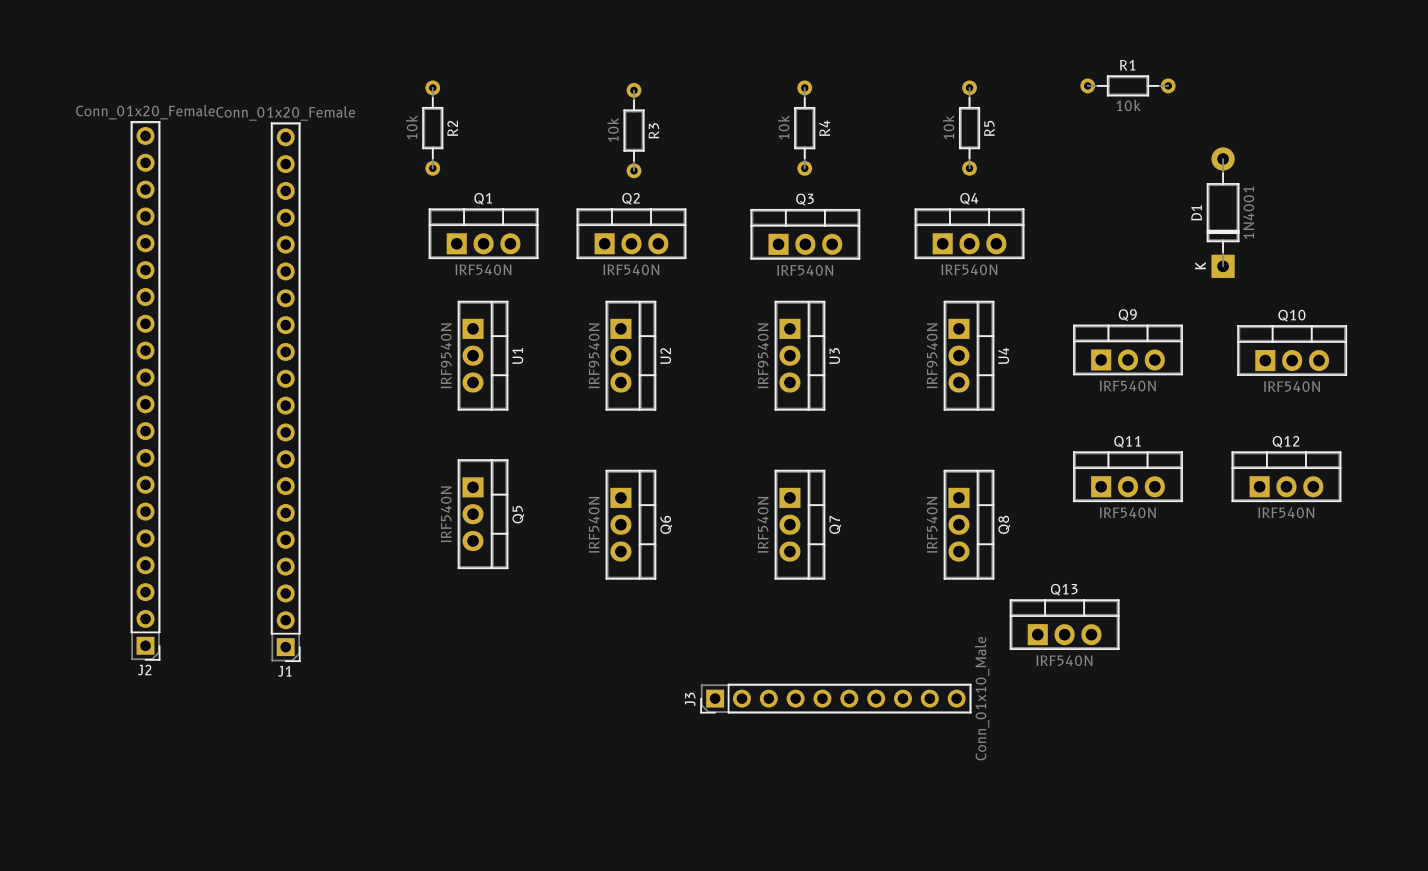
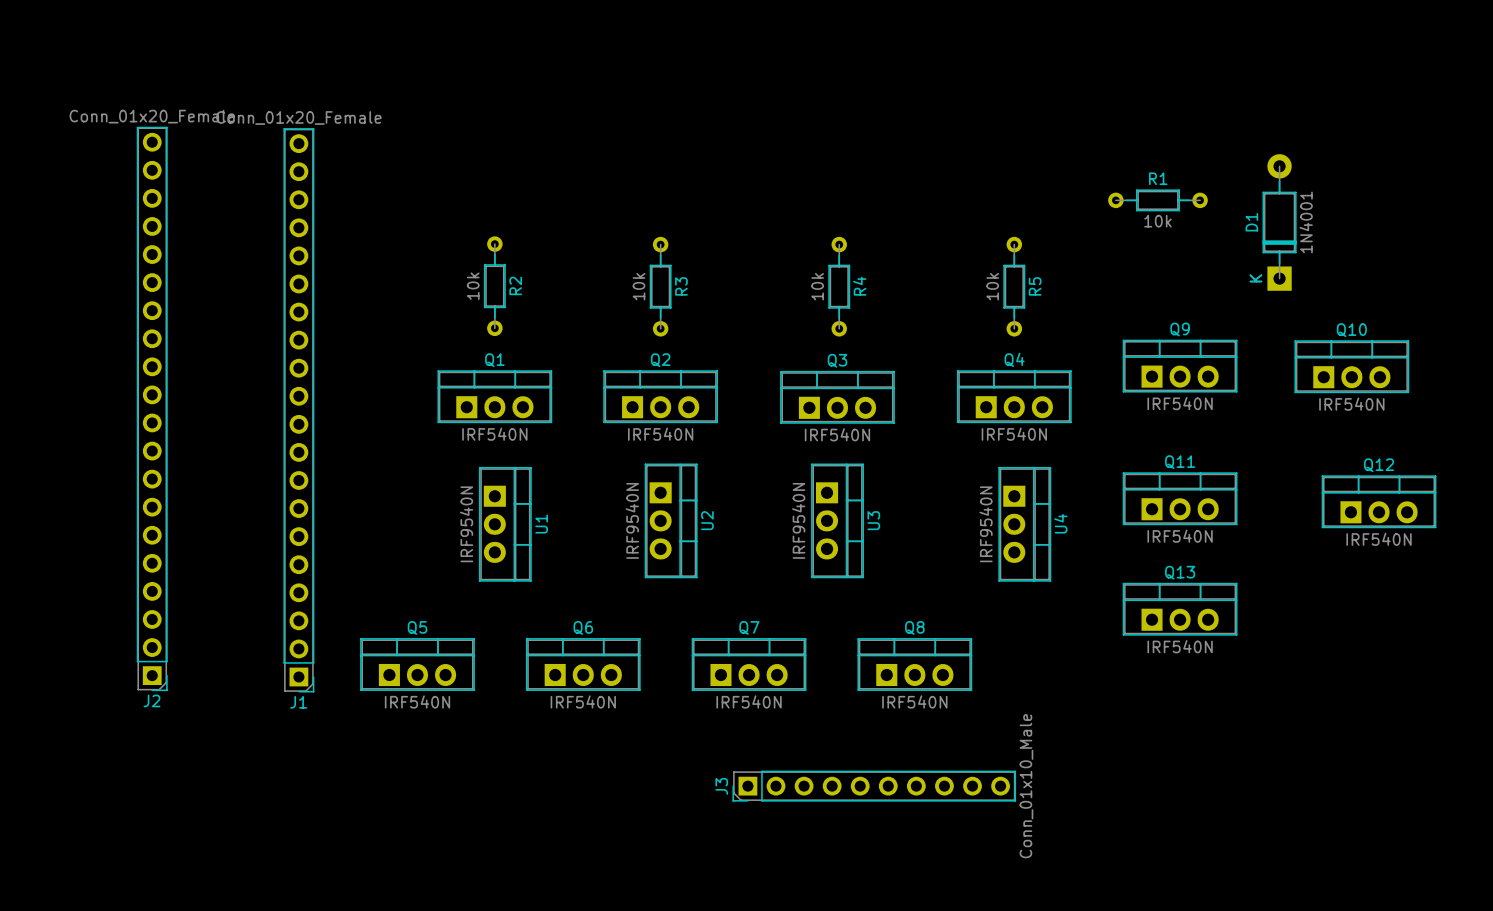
R1 position: (1127, 85) -> (1157, 200)
R2 position: (432, 128) -> (494, 286)
R4 position: (804, 128) -> (839, 286)
R5 position: (969, 128) -> (1014, 286)
R3 position: (634, 130) -> (660, 286)
Q1 position: (483, 233) -> (494, 396)
Q2 position: (631, 233) -> (660, 396)
Q4 position: (969, 233) -> (1014, 396)
Q3 position: (805, 234) -> (837, 397)
U1 position: (483, 355) -> (505, 524)
U2 position: (630, 355) -> (671, 520)
U3 position: (799, 355) -> (837, 520)
U4 position: (969, 355) -> (1024, 524)
Q12 position: (1286, 476) -> (1379, 501)
Q5 rotation: 0° (483, 514) -> 90° counterclockwise (417, 664)
Q5 position: (483, 514) -> (417, 664)
Q6 rotation: 0° (630, 524) -> 90° counterclockwise (583, 664)
Q6 position: (630, 524) -> (583, 664)
Q7 rotation: 0° (799, 524) -> 90° counterclockwise (749, 664)
Q7 position: (799, 524) -> (749, 664)
Q8 rotation: 0° (969, 524) -> 90° counterclockwise (914, 664)
Q8 position: (969, 524) -> (914, 664)
Q13 position: (1064, 624) -> (1180, 609)
J3 position: (835, 698) -> (874, 786)

